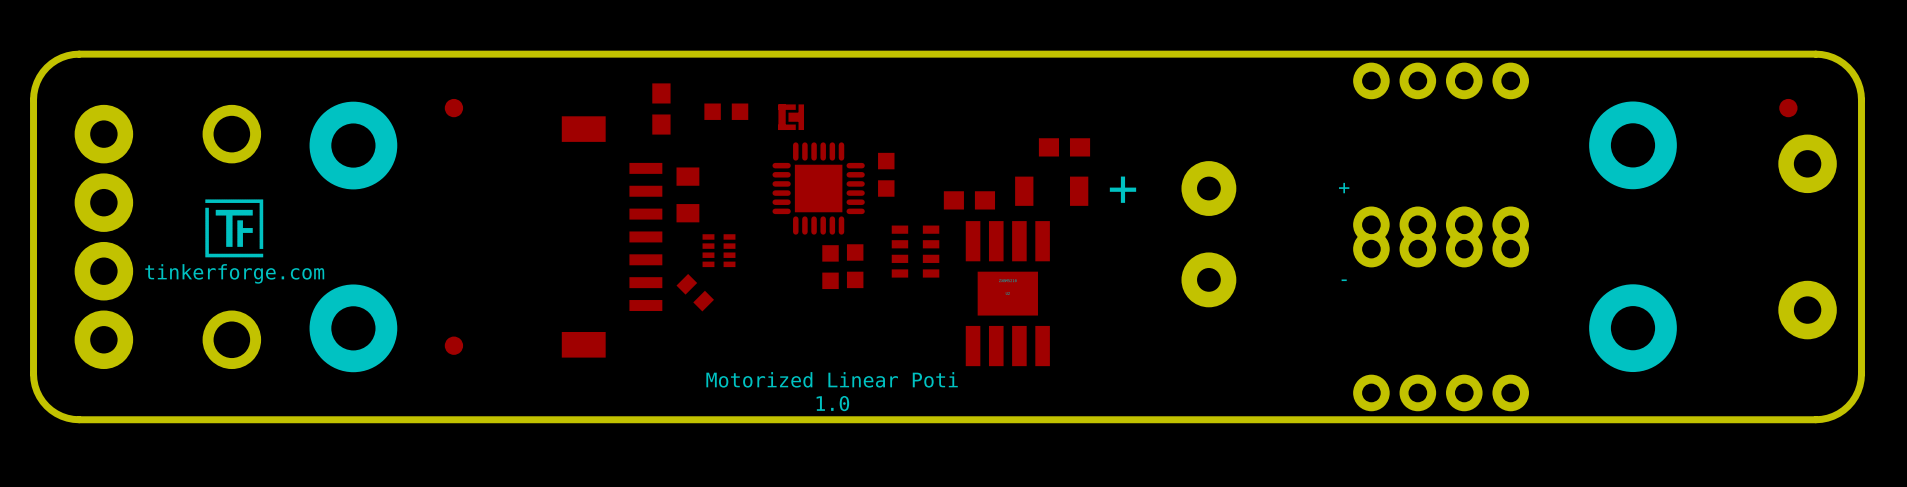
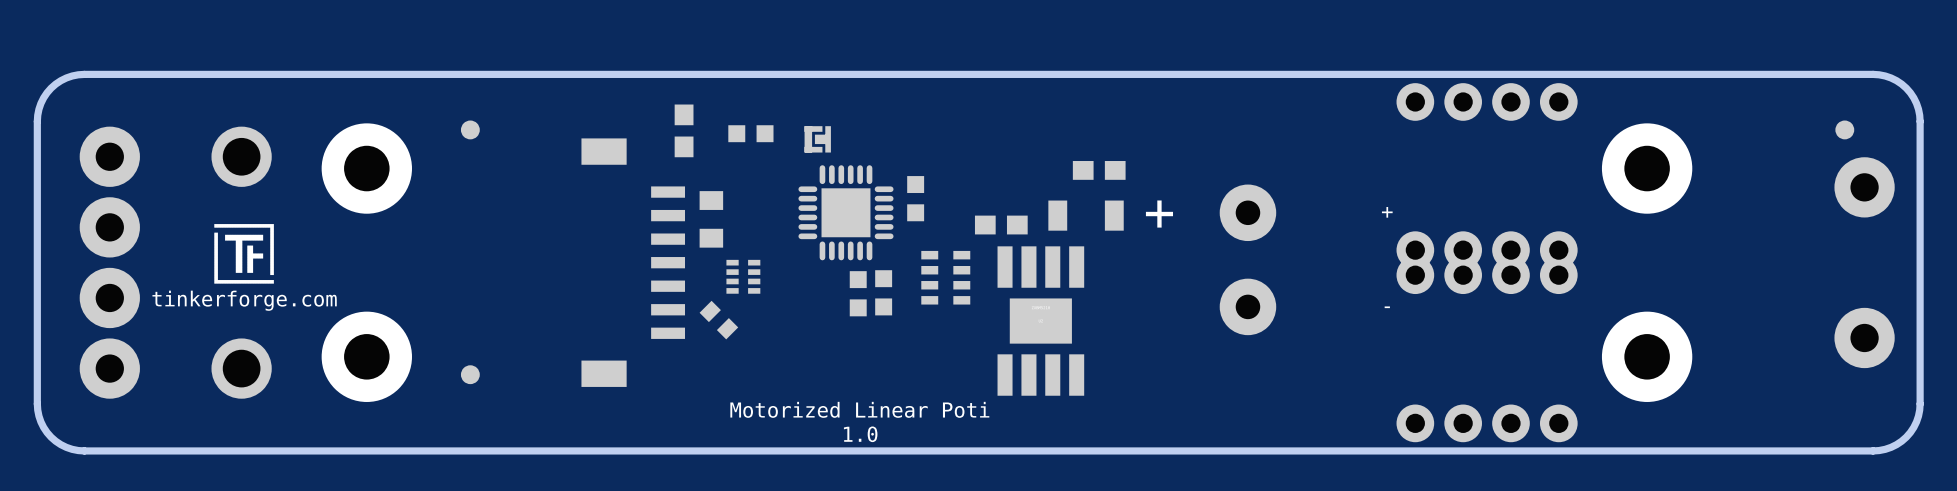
part position: (1633, 145) -> (1647, 168)
part position: (1633, 328) -> (1647, 356)

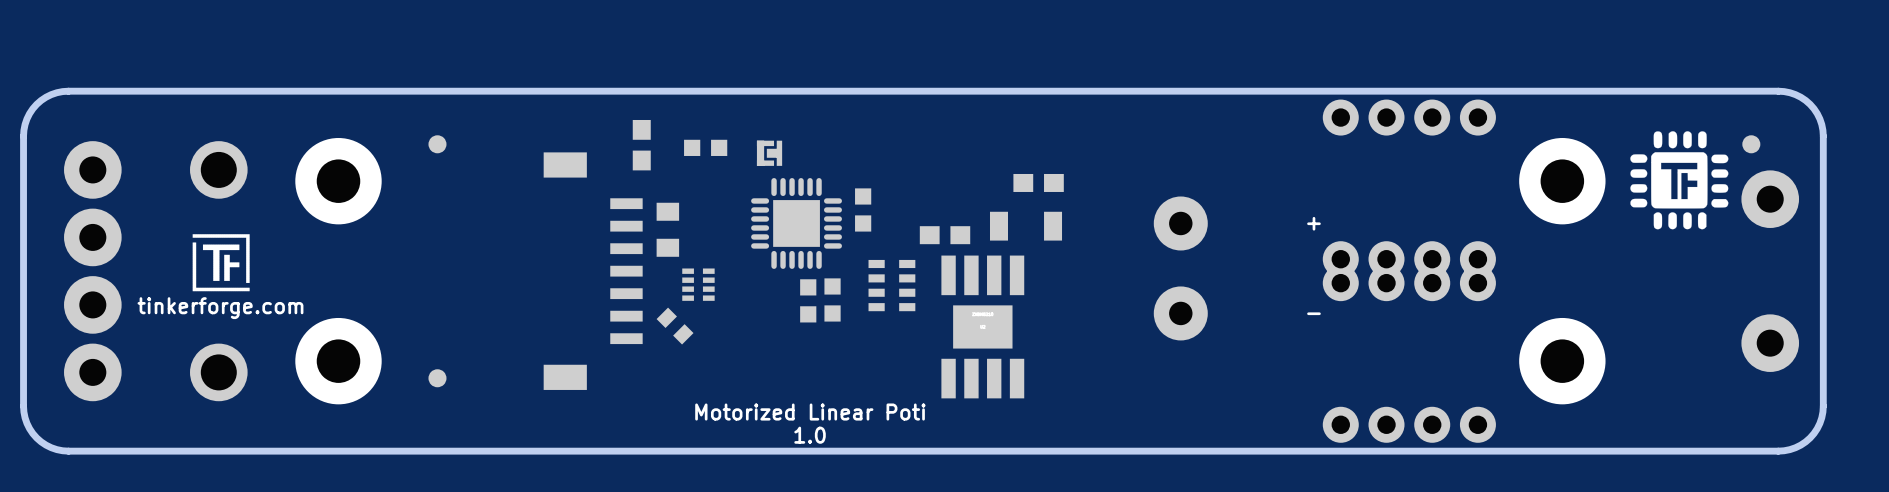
drawing: none -> [1630, 131, 1729, 230]
text: + (1159, 214) -> none

